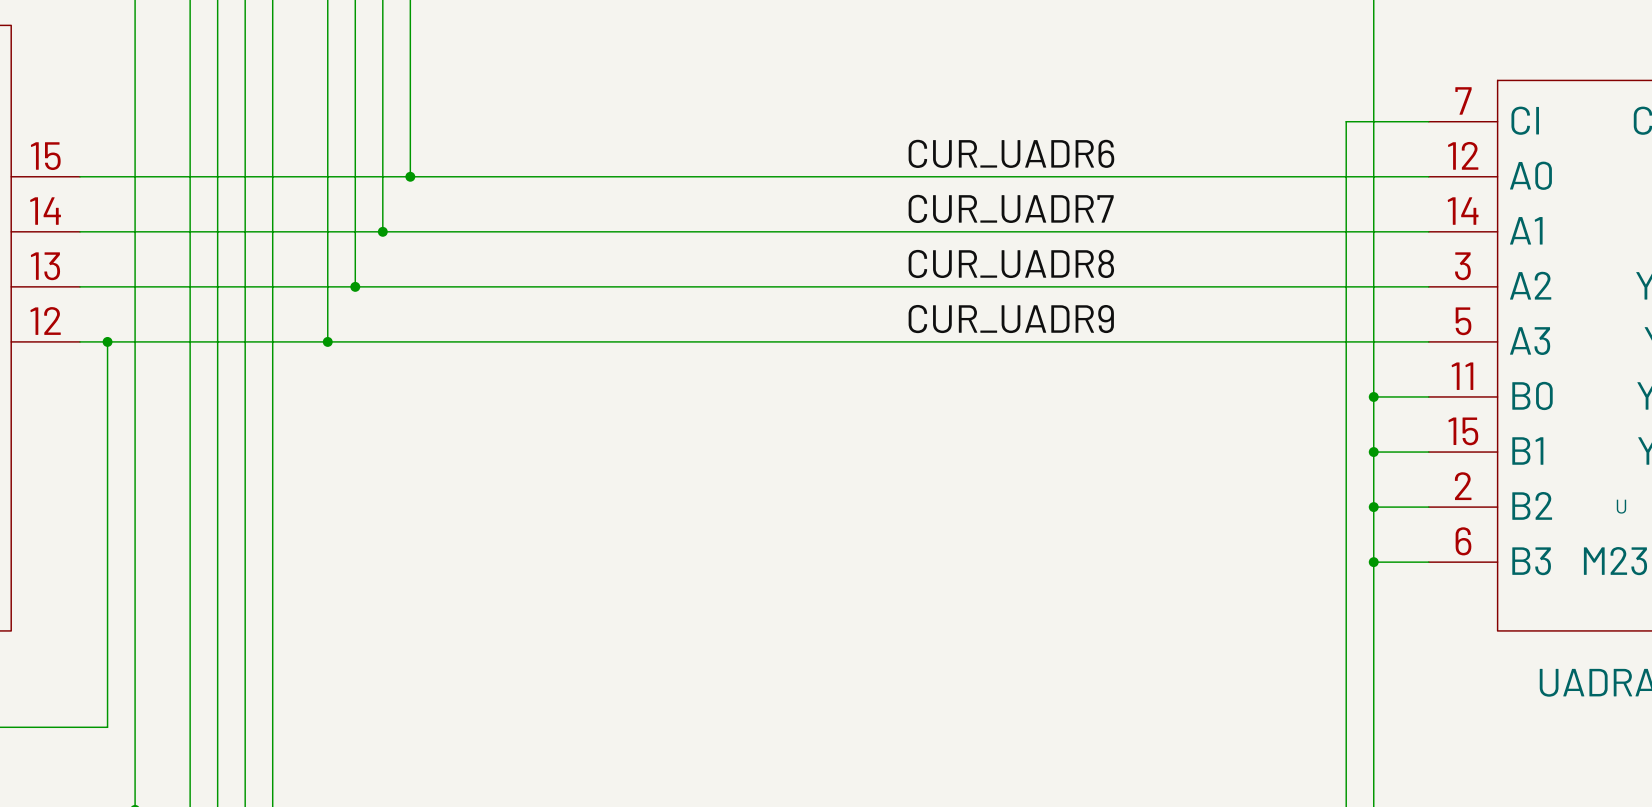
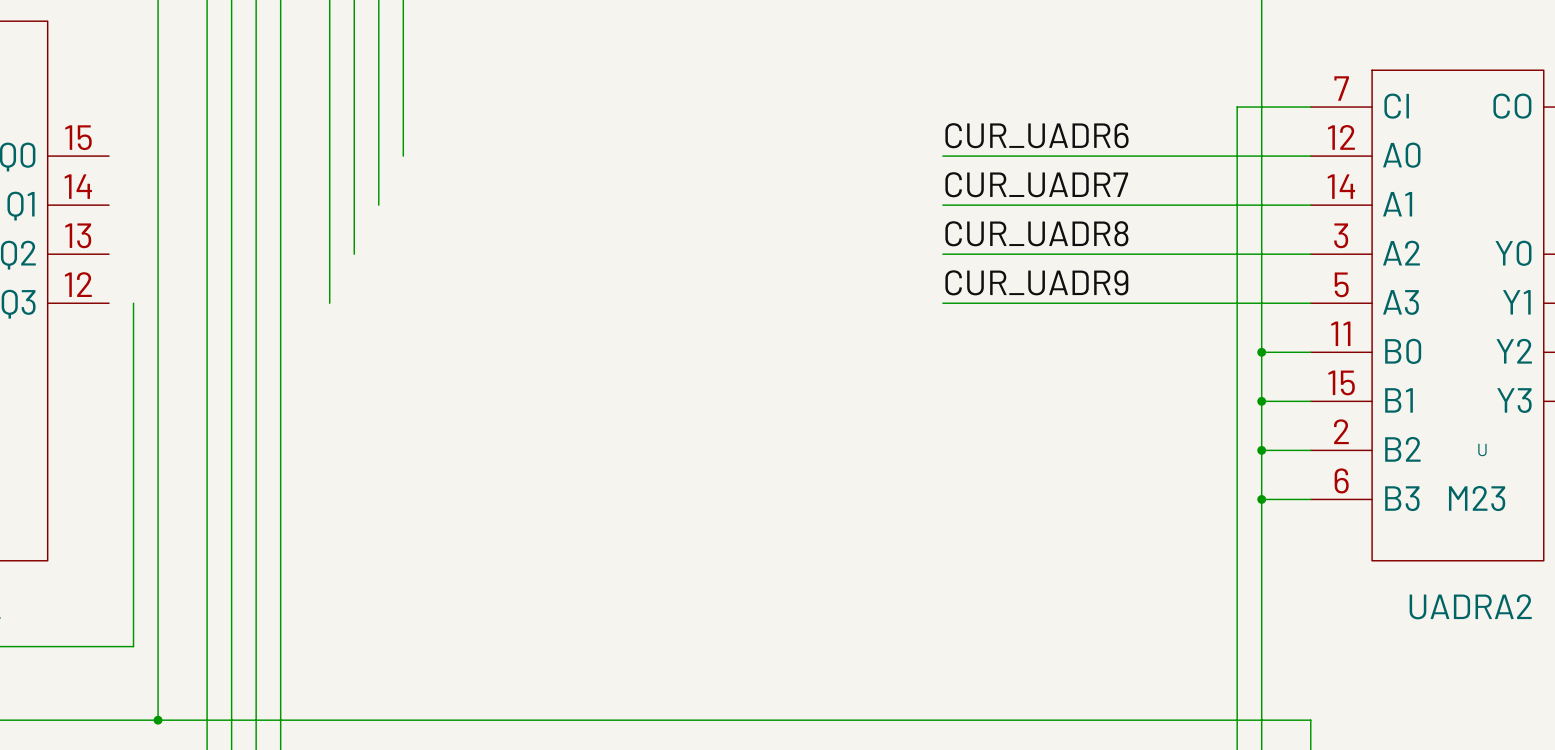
label position: CUR_UADR6 (1011, 153) -> CUR_UADR6 (1037, 135)
wire: (80, 176) (1015, 176) -> none
junction: (410, 176) -> none
label position: CUR_UADR7 (1011, 208) -> CUR_UADR7 (1036, 184)
wire: (80, 231) (1015, 231) -> none
junction: (382, 231) -> none
label position: CUR_UADR8 (1011, 263) -> CUR_UADR8 (1036, 233)
wire: (80, 286) (1015, 286) -> none
junction: (355, 286) -> none
label position: CUR_UADR9 (1011, 319) -> CUR_UADR9 (1036, 282)
wire: (80, 341) (1015, 341) -> none
junction: (107, 341) -> none
junction: (327, 341) -> none

